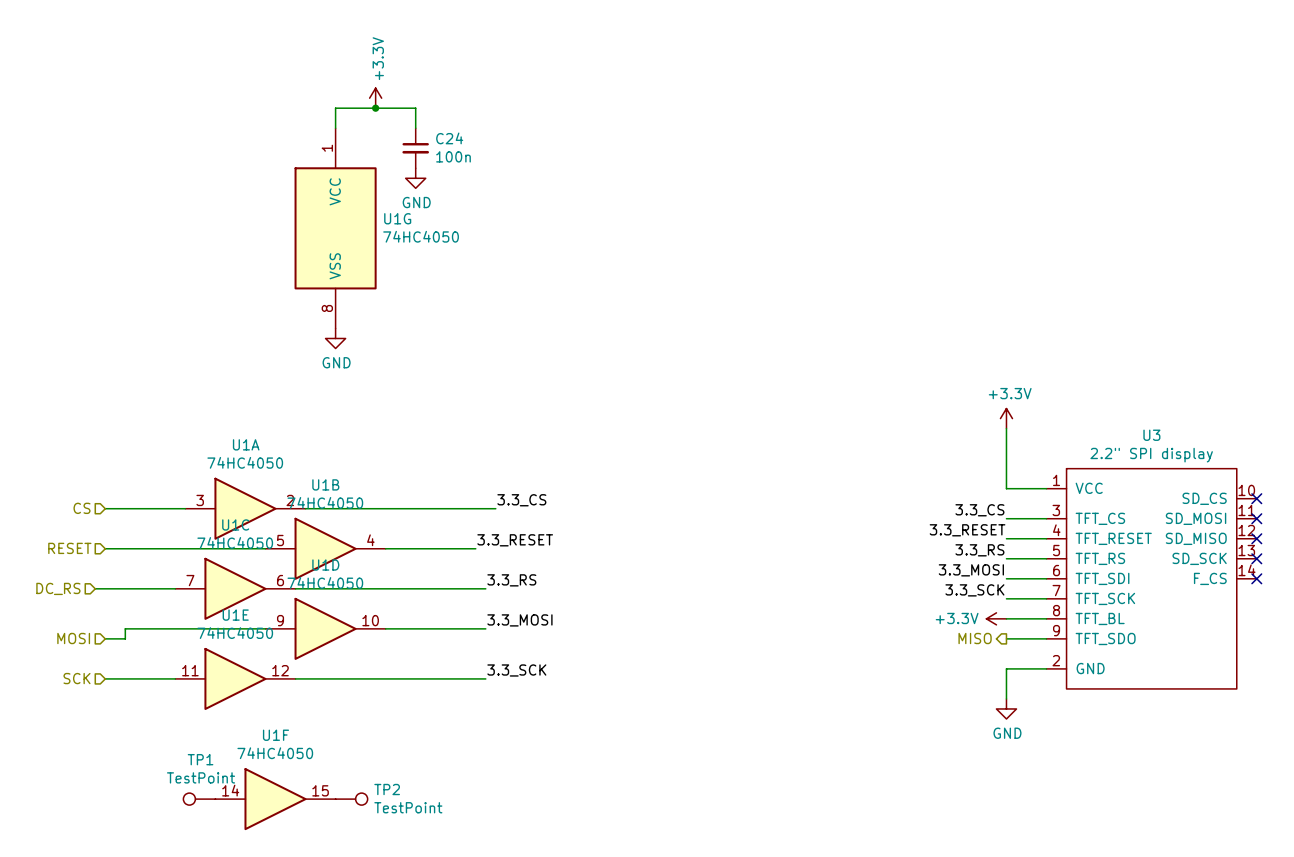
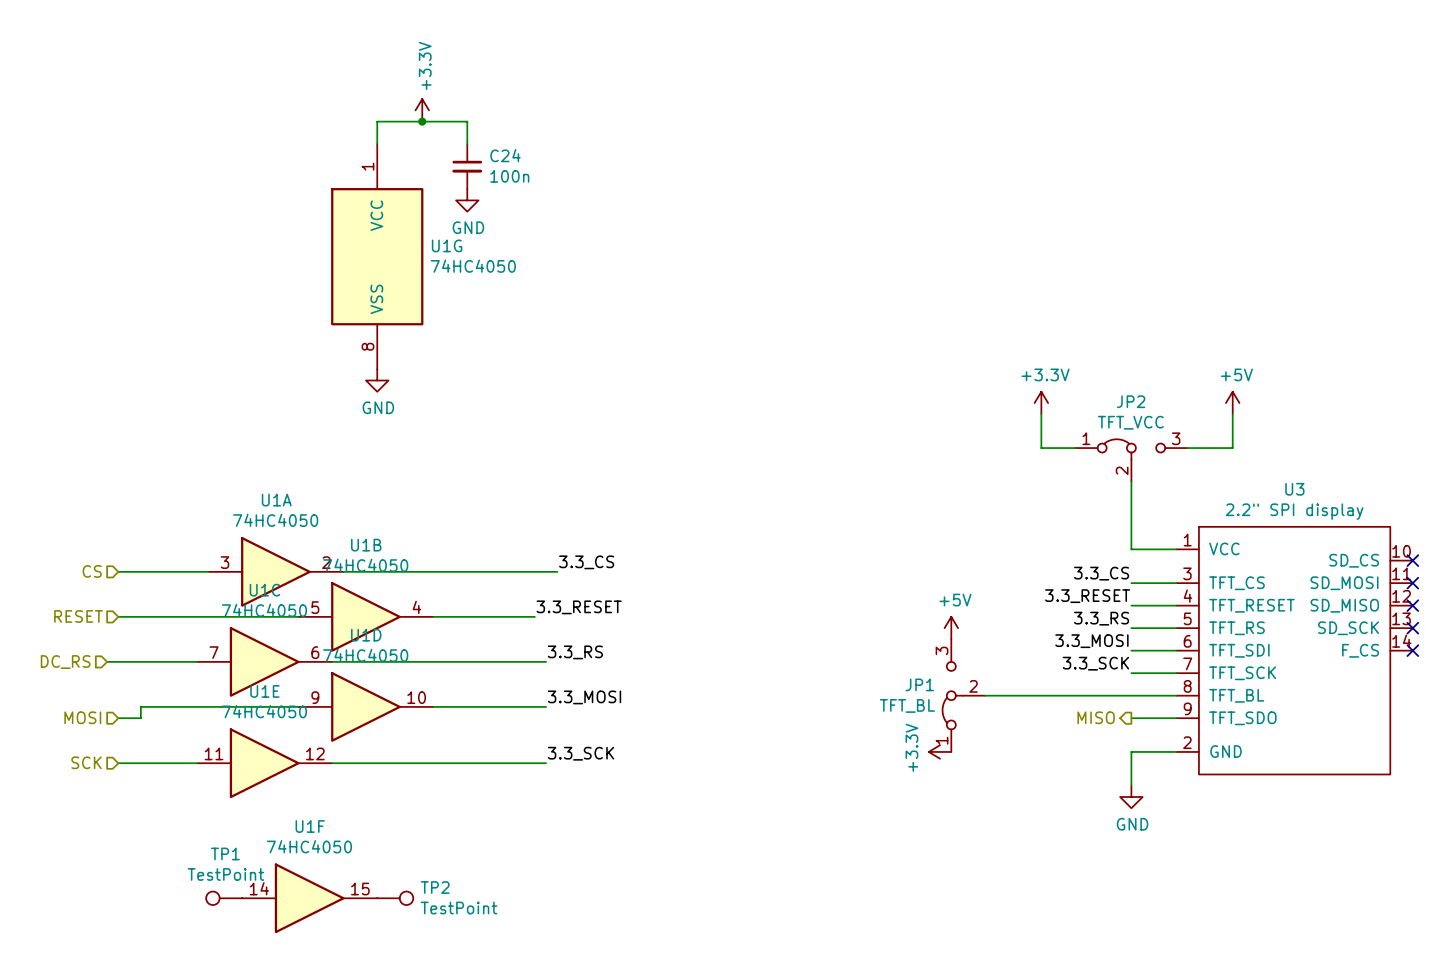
power symbol: none -> +5V (1232, 403)
wire: none -> (1041, 414) (1041, 448) (1075, 448)
wire: none -> (1232, 414) (1232, 448) (1187, 448)
JP2: none -> TFT_VCC (1131, 460)
power symbol position: +3.3V (1006, 418) -> +3.3V (1041, 403)
power symbol: none -> +5V (951, 628)
JP1: none -> TFT_BL (963, 695)
wire: none -> (985, 695) (1131, 695)
power symbol: +3.3V (996, 618) -> none
power symbol: none -> +3.3V (940, 751)

